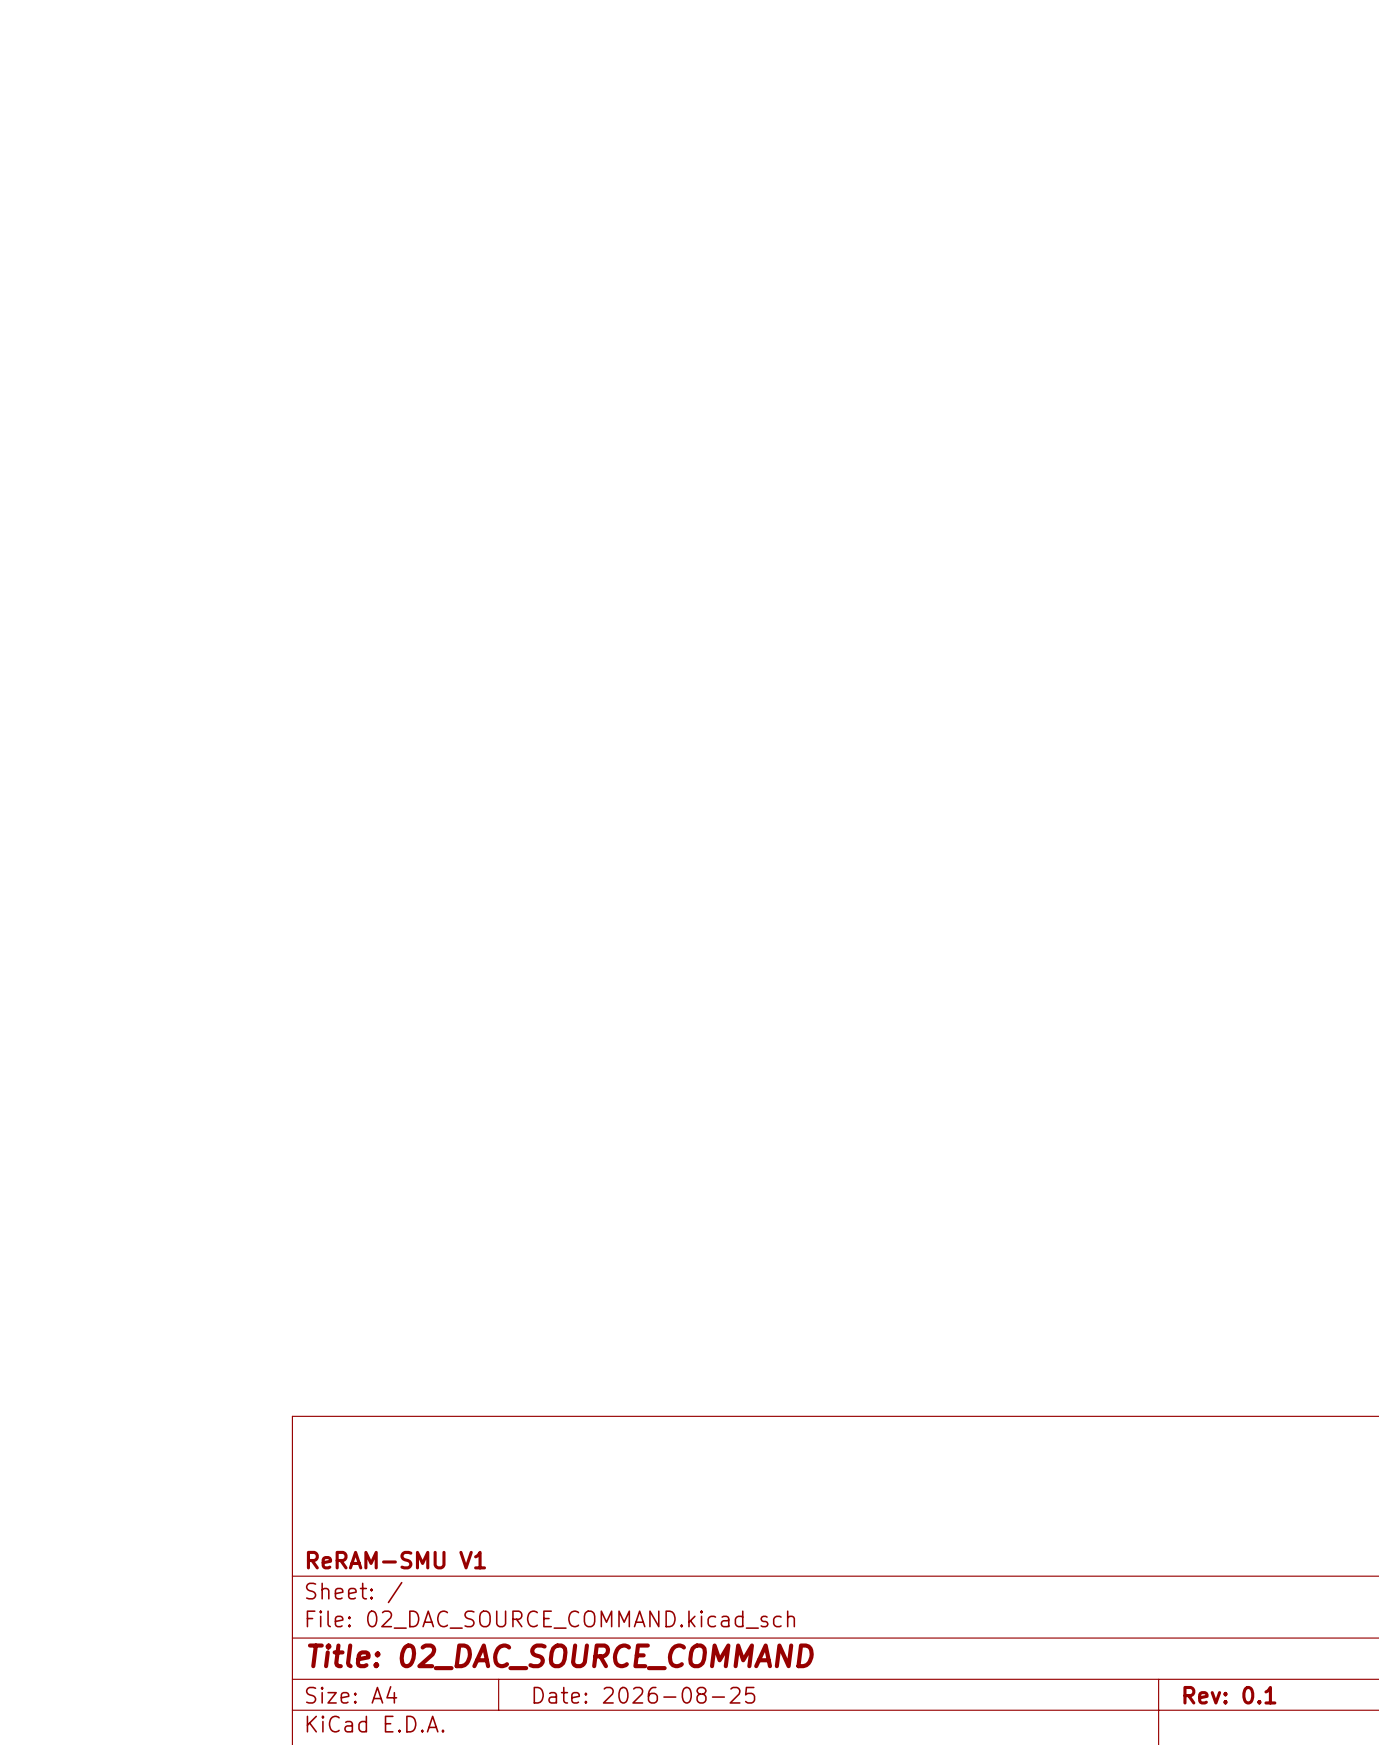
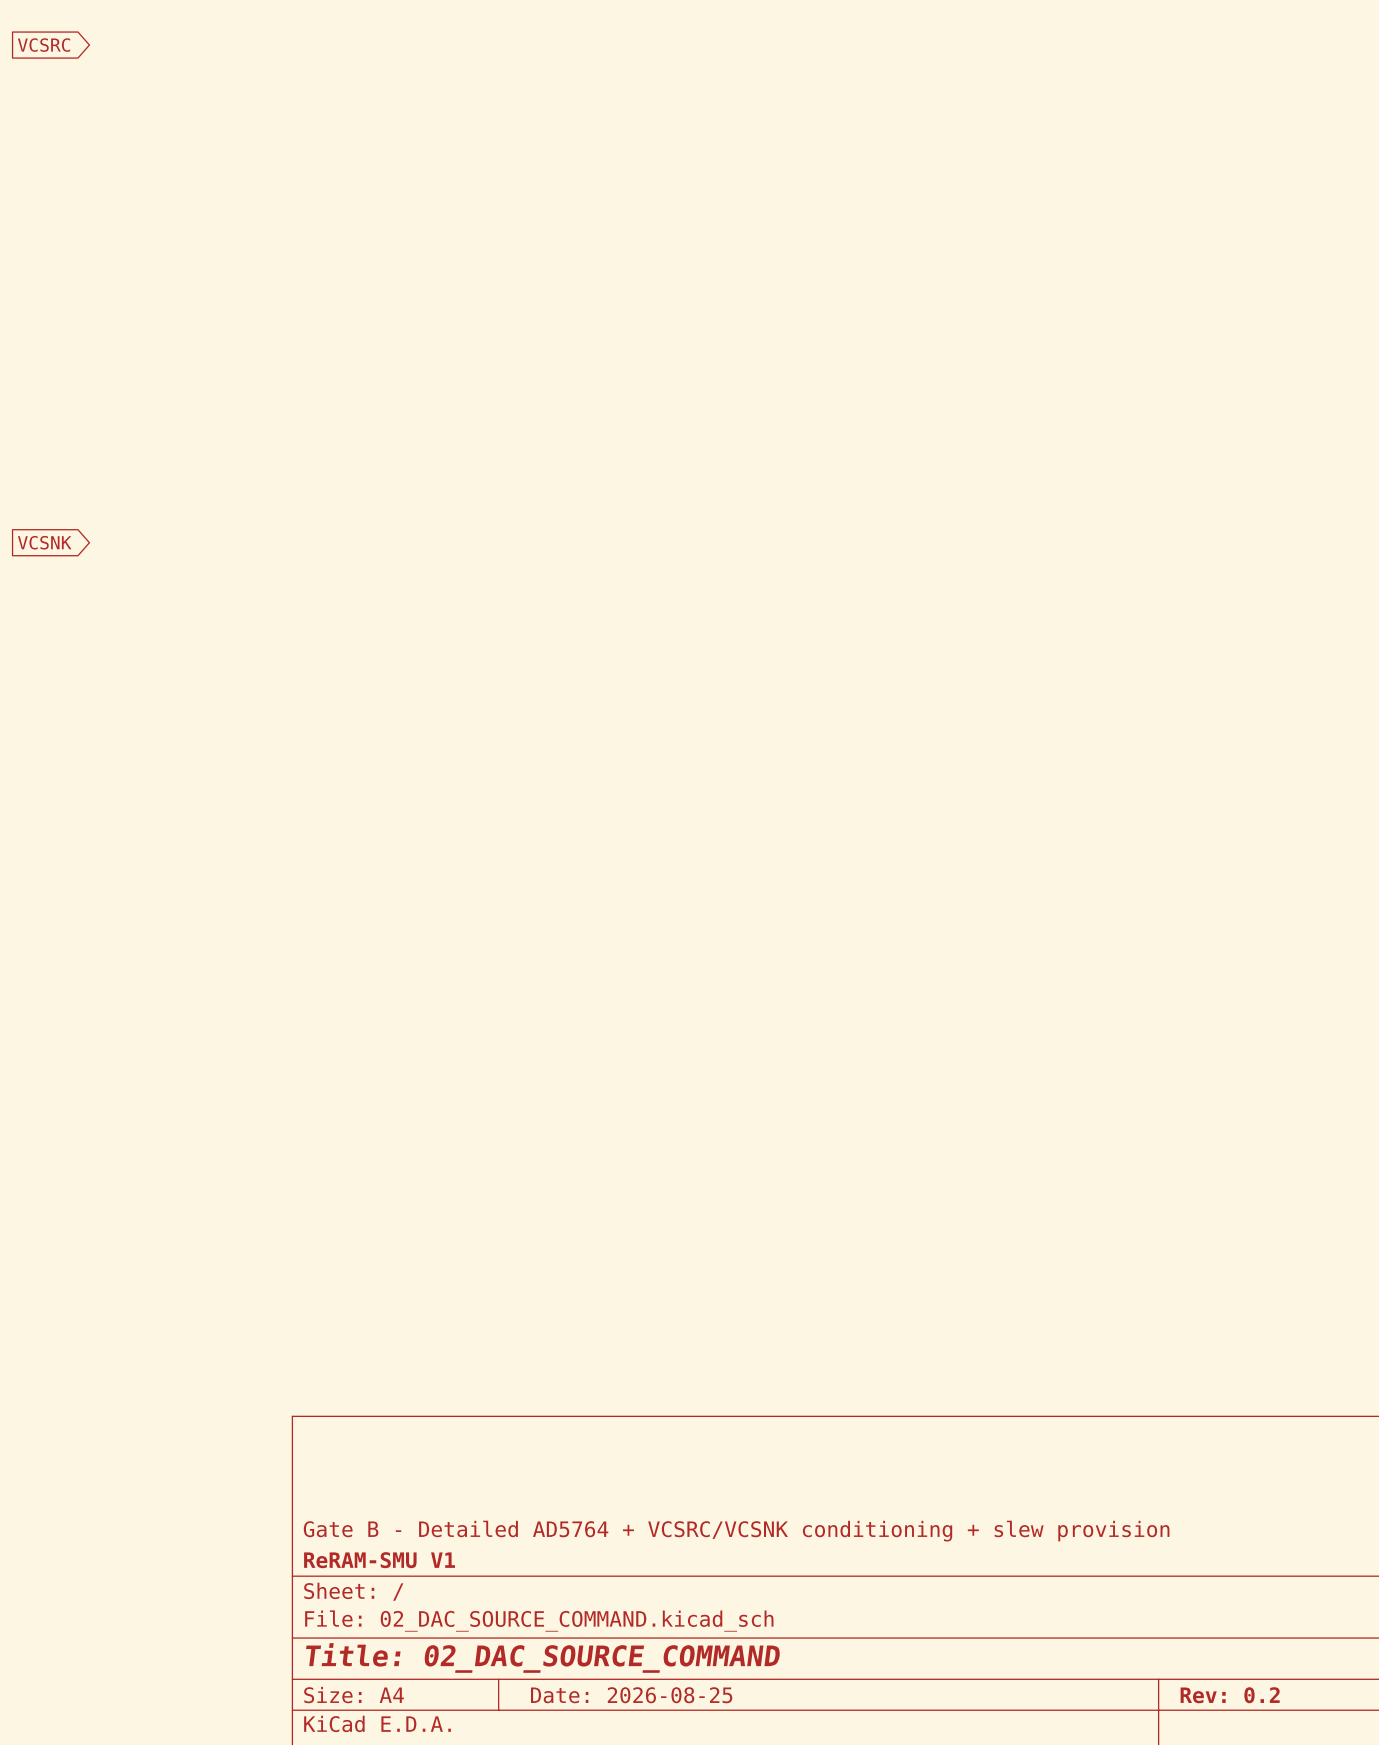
global label: none -> VCSRC (44, 45)
global label: none -> VCSNK (44, 542)
title block: none -> Gate B - Detailed AD5764 + VCSRC/VCSNK conditioning + slew provision (736, 1531)
title block: Rev: 0.1 (1229, 1695) -> Rev: 0.2 (1230, 1695)

